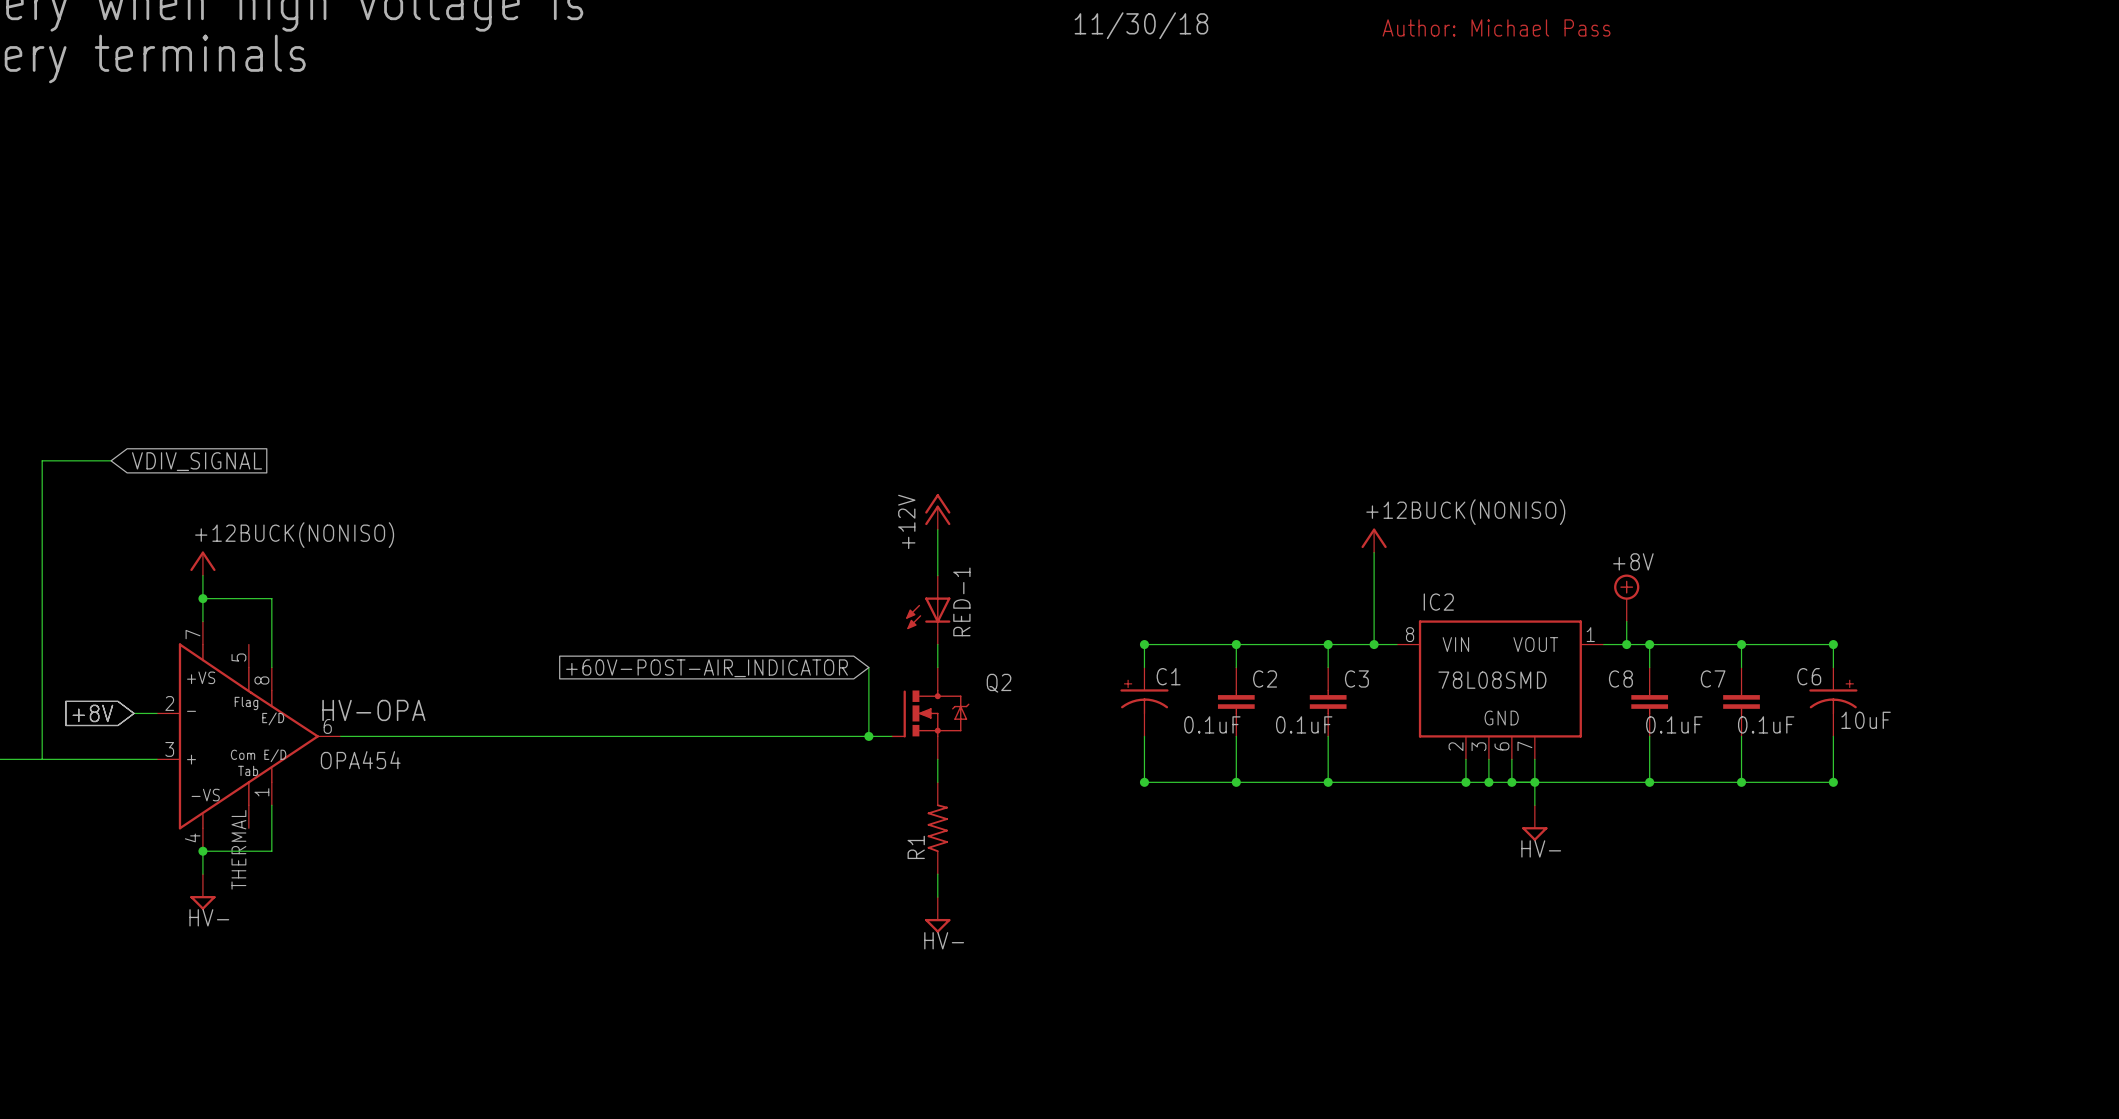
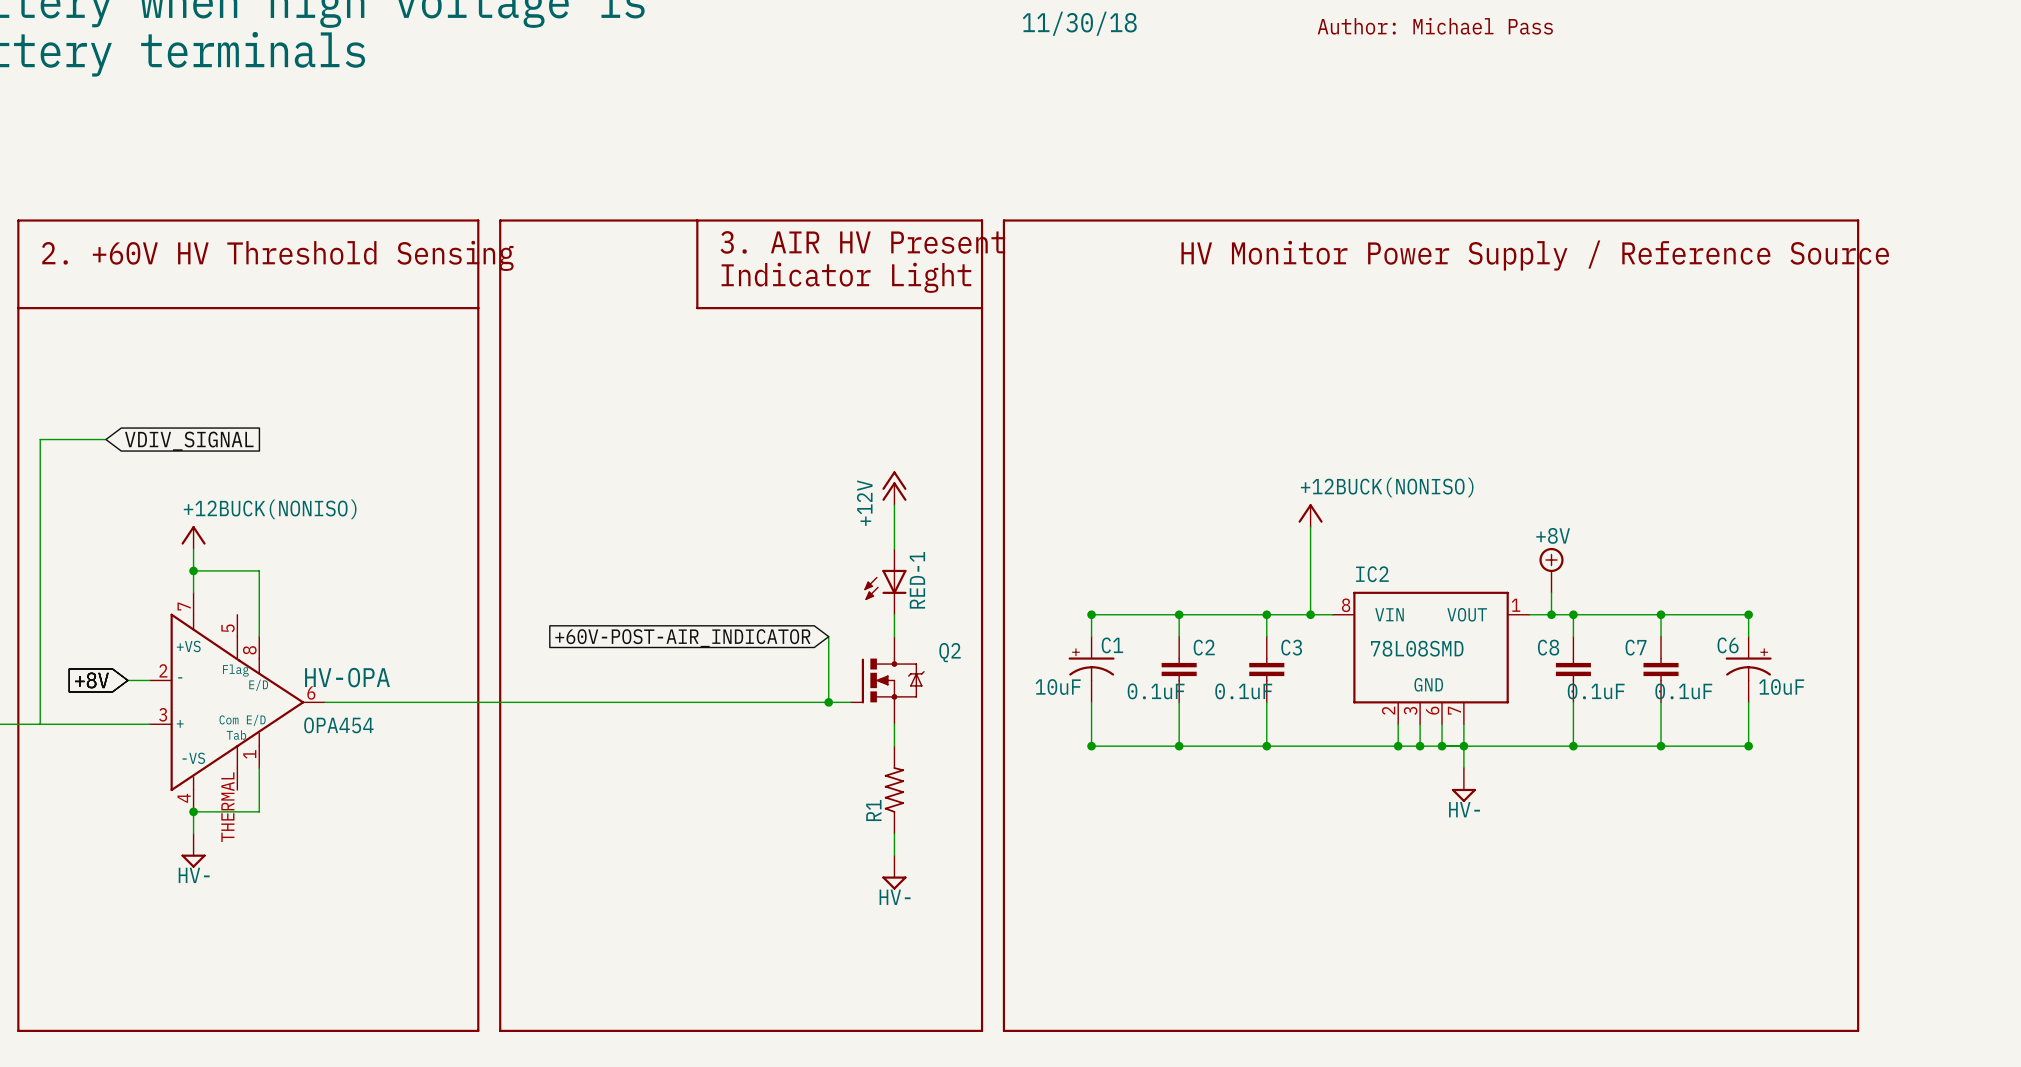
line: none -> (18, 220) (478, 220) (478, 1030) (18, 1030) (18, 220)
line: none -> (500, 220) (982, 220) (982, 1030) (500, 1030) (500, 220)
line: none -> (697, 220) (697, 308) (982, 308)
line: none -> (1003, 220) (1858, 220) (1858, 1030) (1003, 1030) (1003, 220)
text: none -> 3. AIR HV Present (862, 242)
text: none -> HV Monitor Power Supply / Reference Source (1535, 255)
text: none -> 2. +60V HV Threshold Sensing (277, 255)
text: none -> Indicator Light (846, 277)
line: none -> (18, 308) (478, 308)
C1 value: none -> 10uF (1058, 687)

